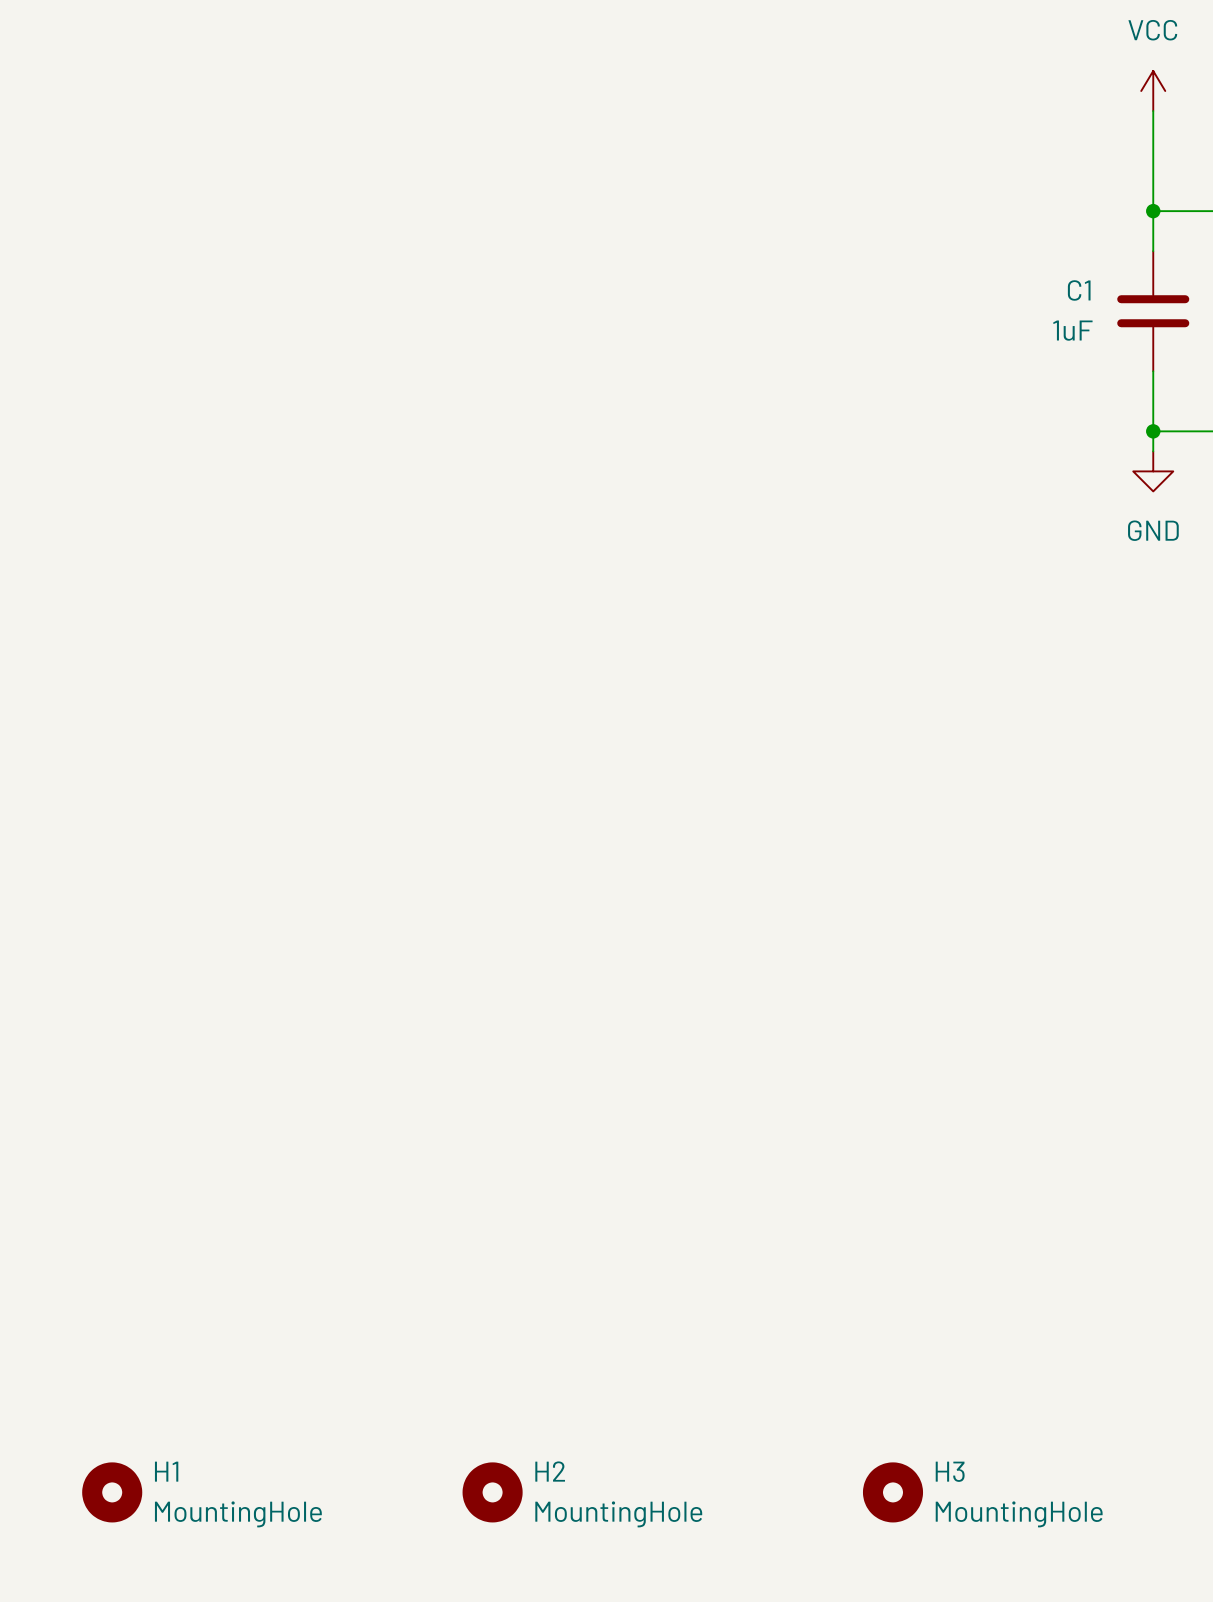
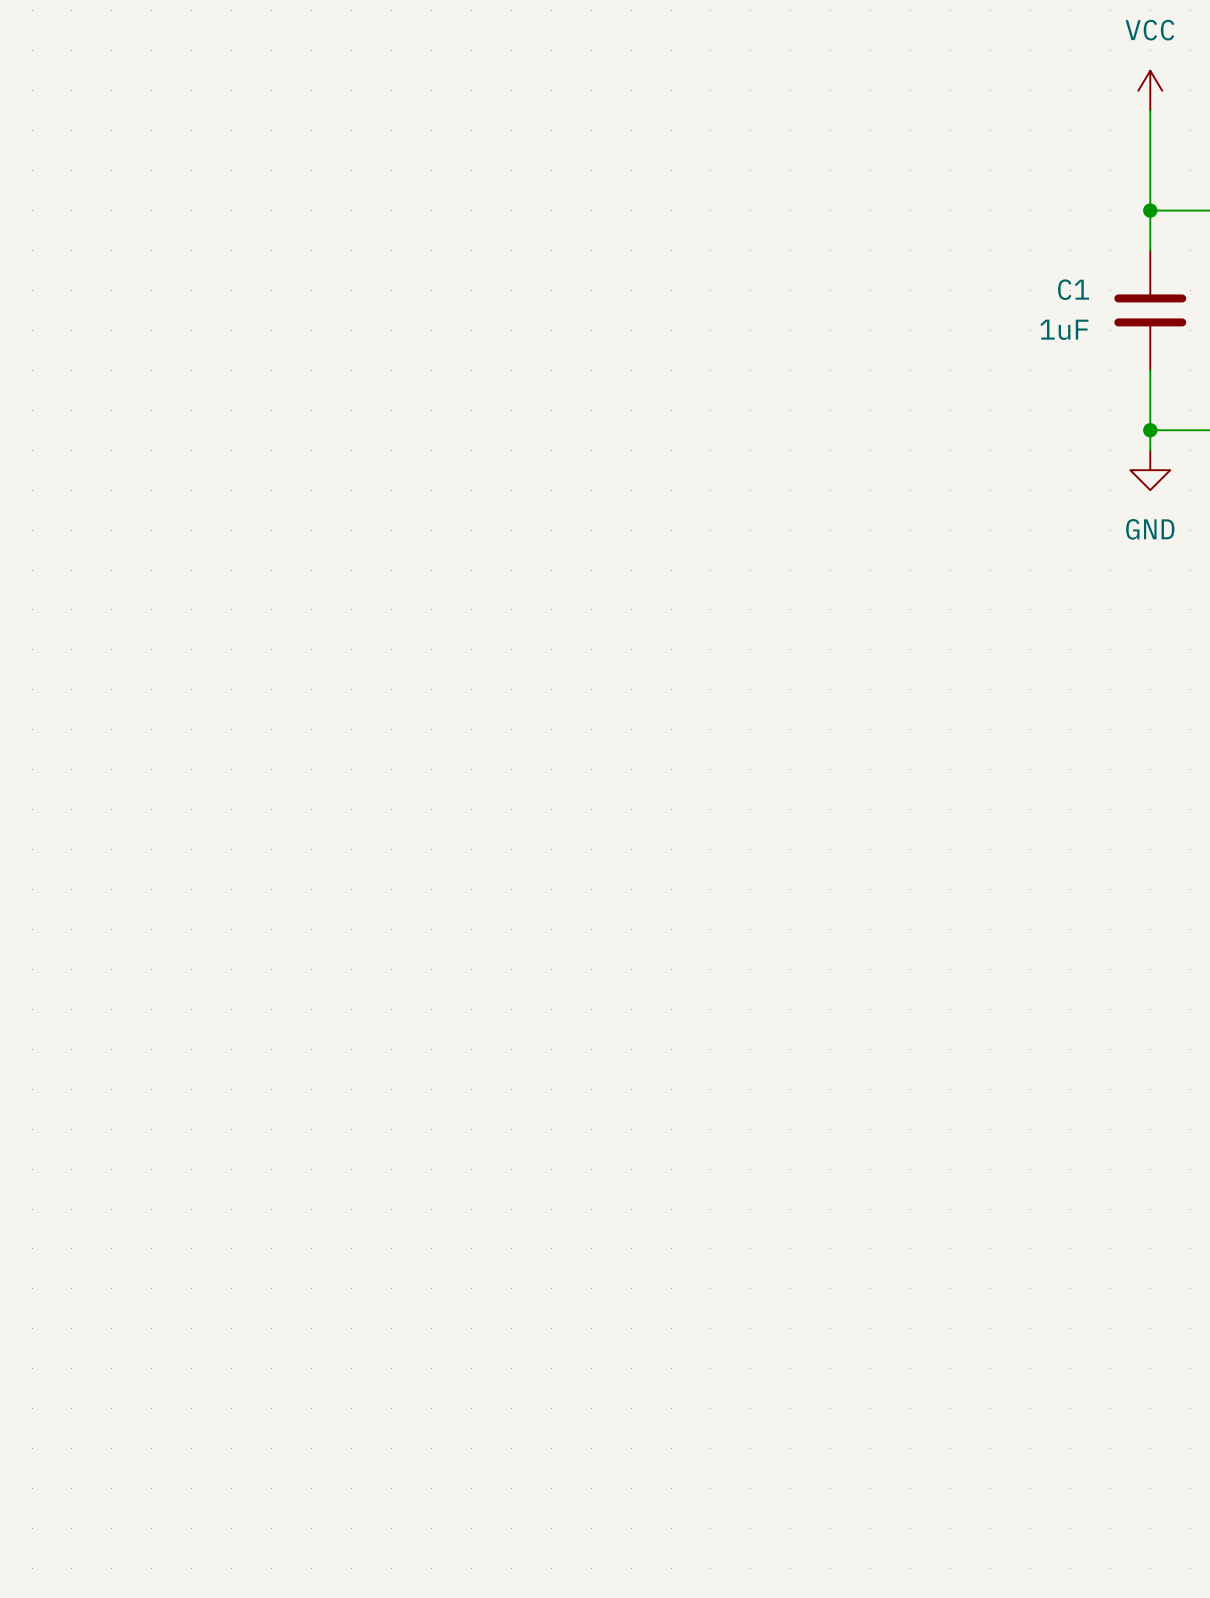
H1: MountingHole (112, 1492) -> none
H2: MountingHole (492, 1492) -> none
H3: MountingHole (892, 1492) -> none

